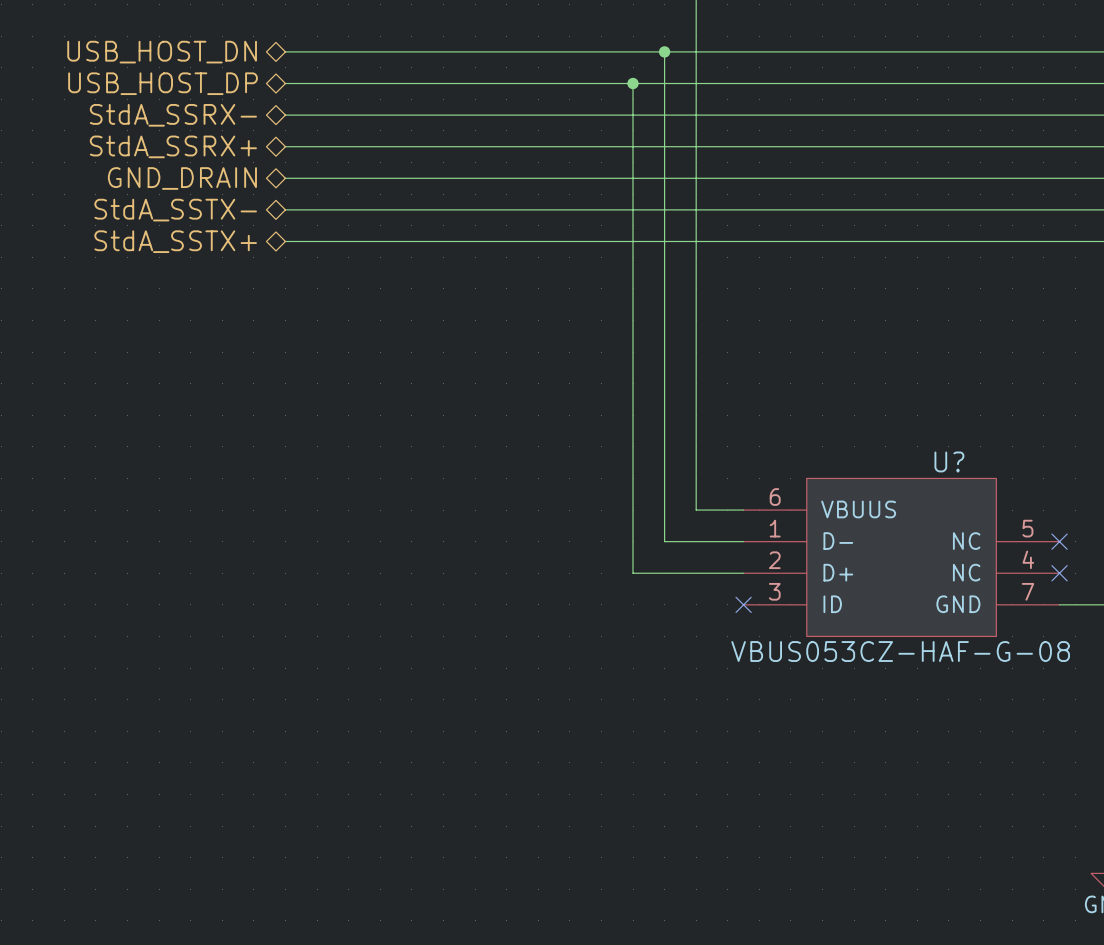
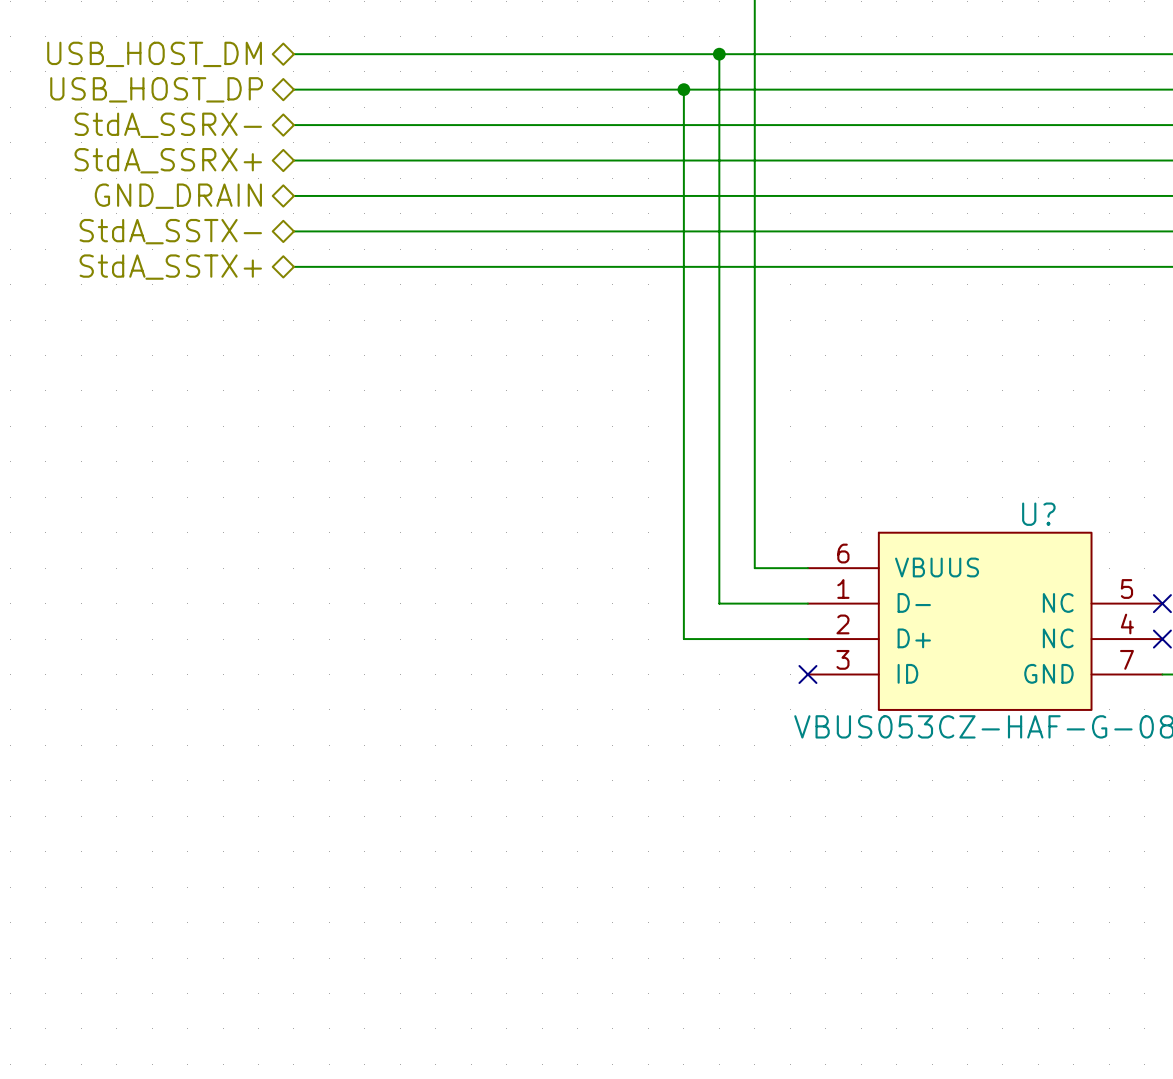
hierarchical label: USB_HOST_DN (162, 52) -> USB_HOST_DM (154, 54)

